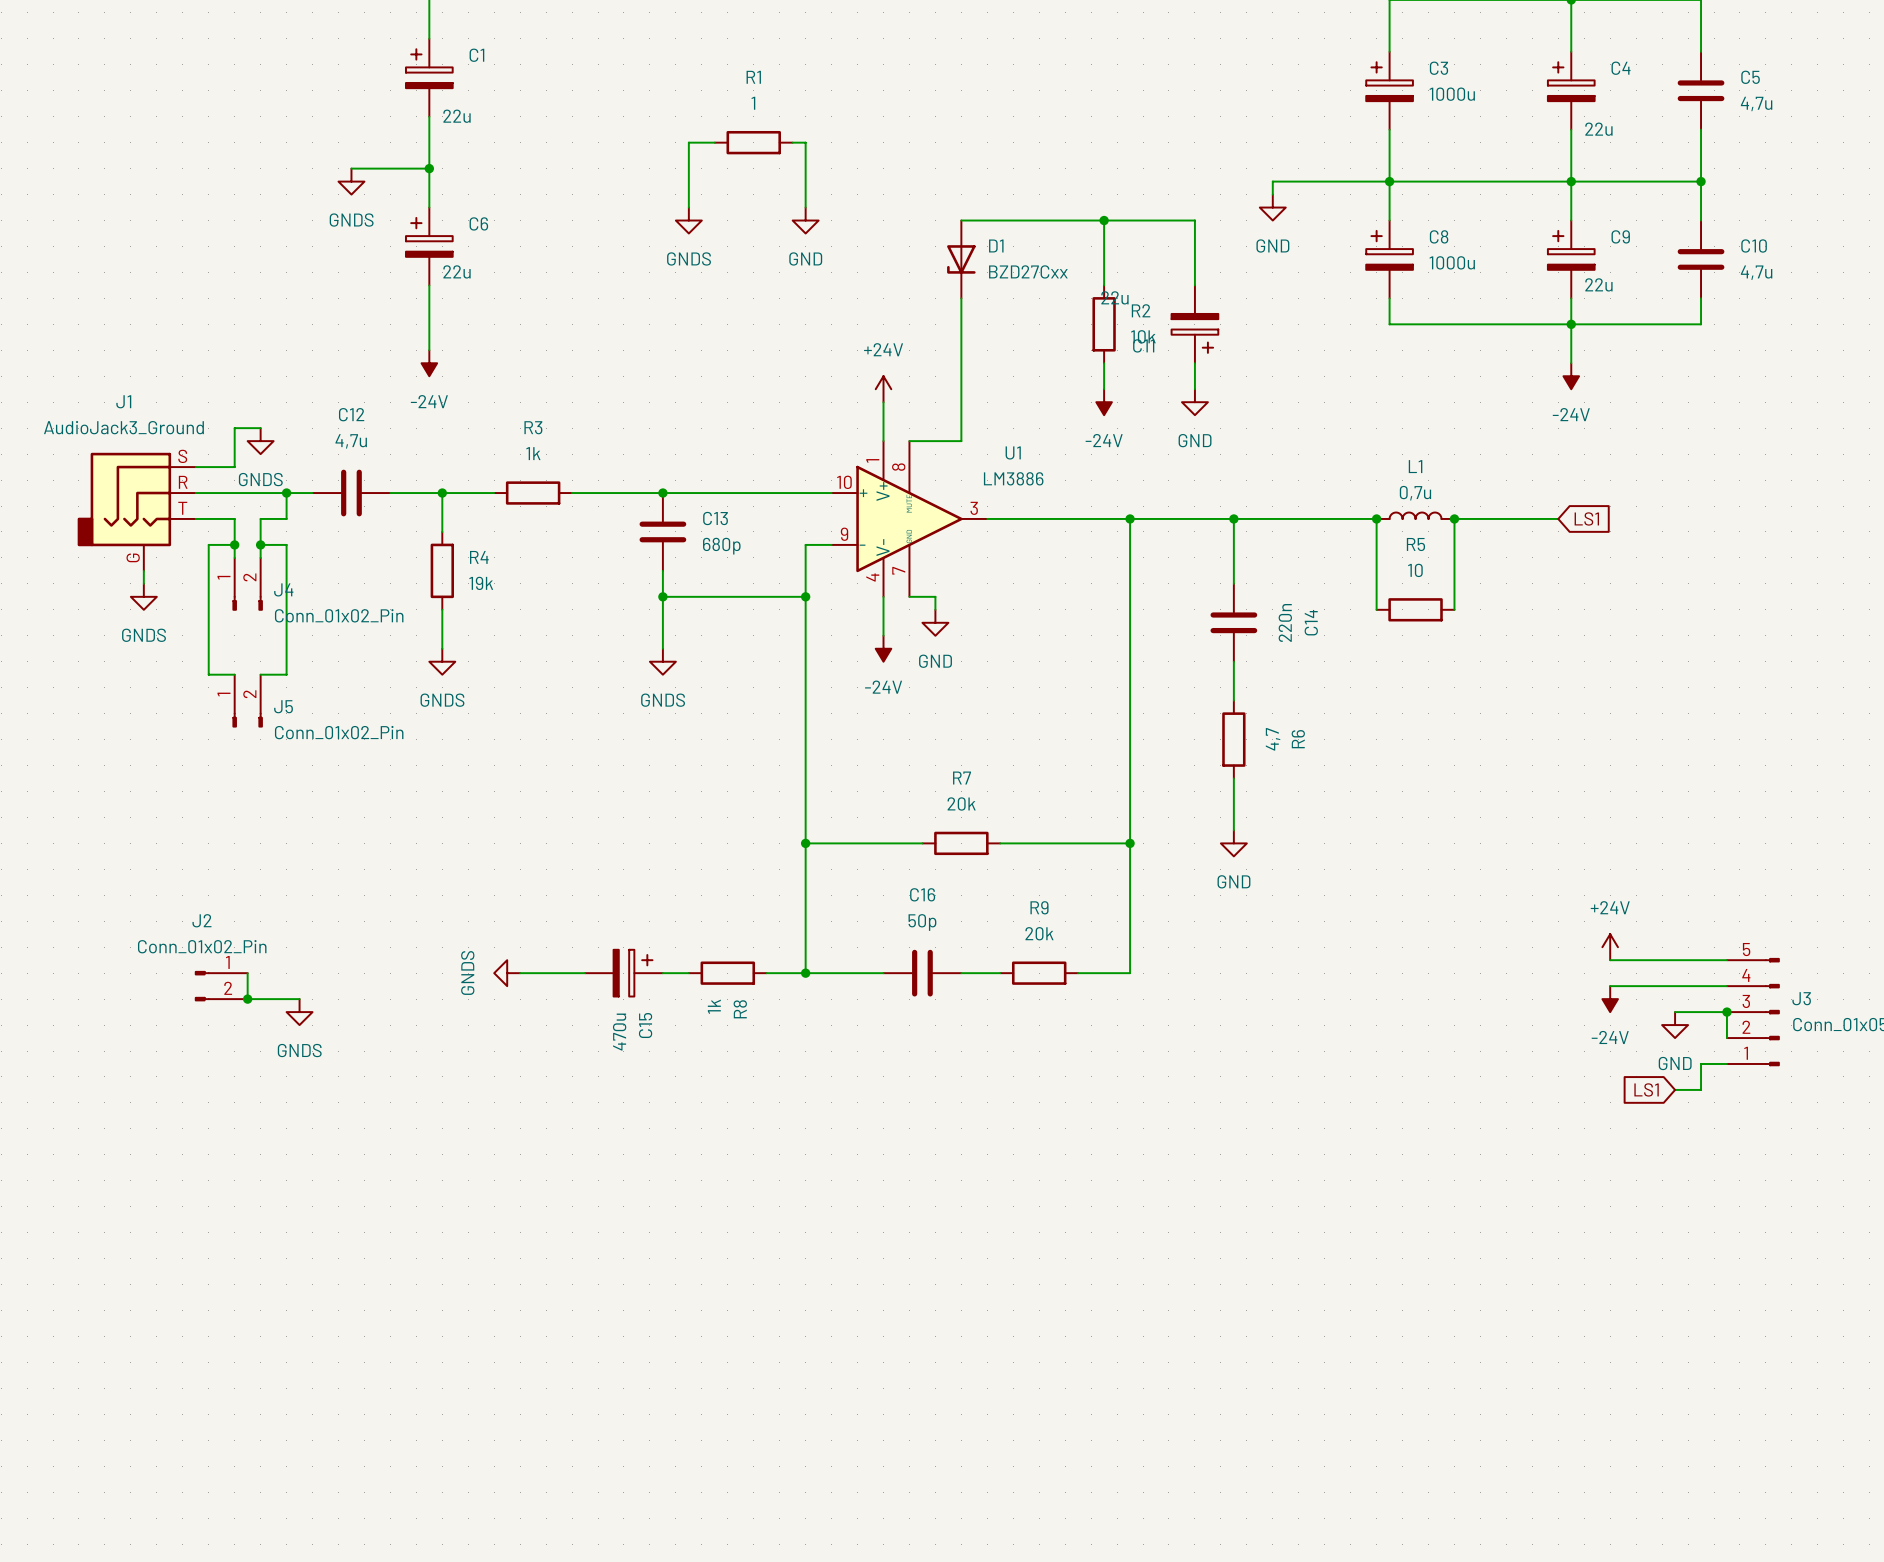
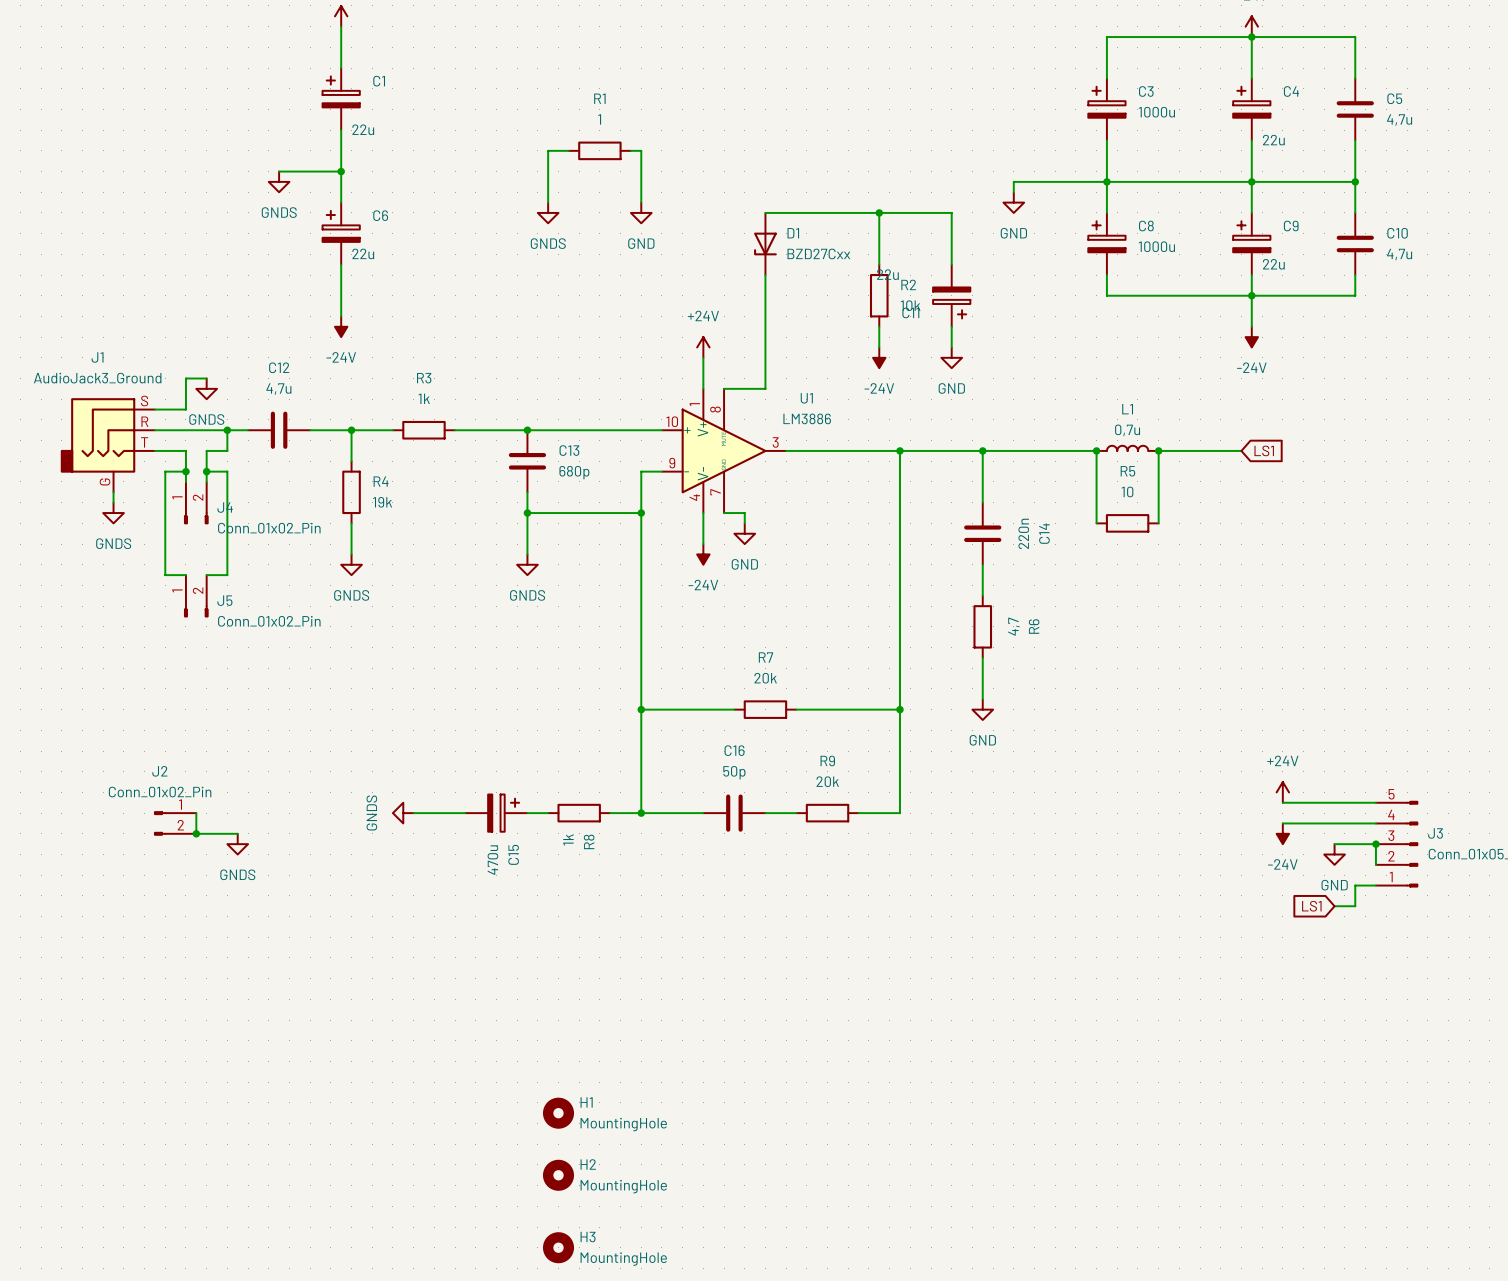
H1: none -> MountingHole (558, 1113)
H2: none -> MountingHole (558, 1175)
H3: none -> MountingHole (558, 1247)

